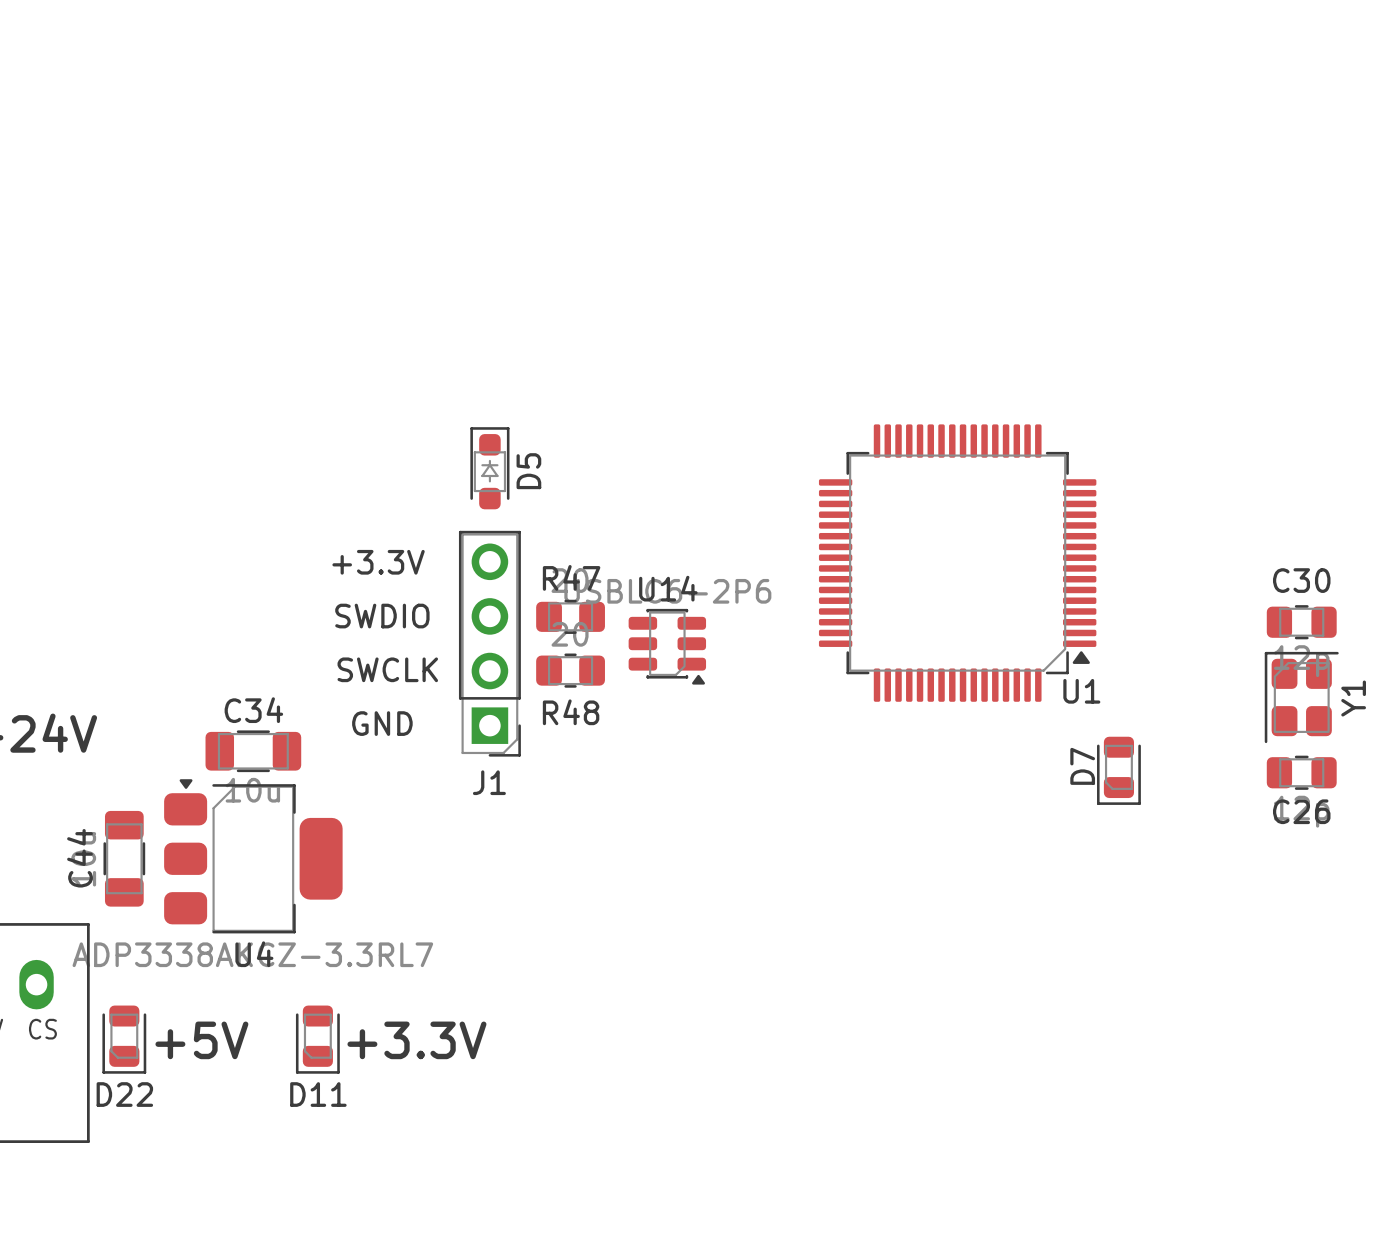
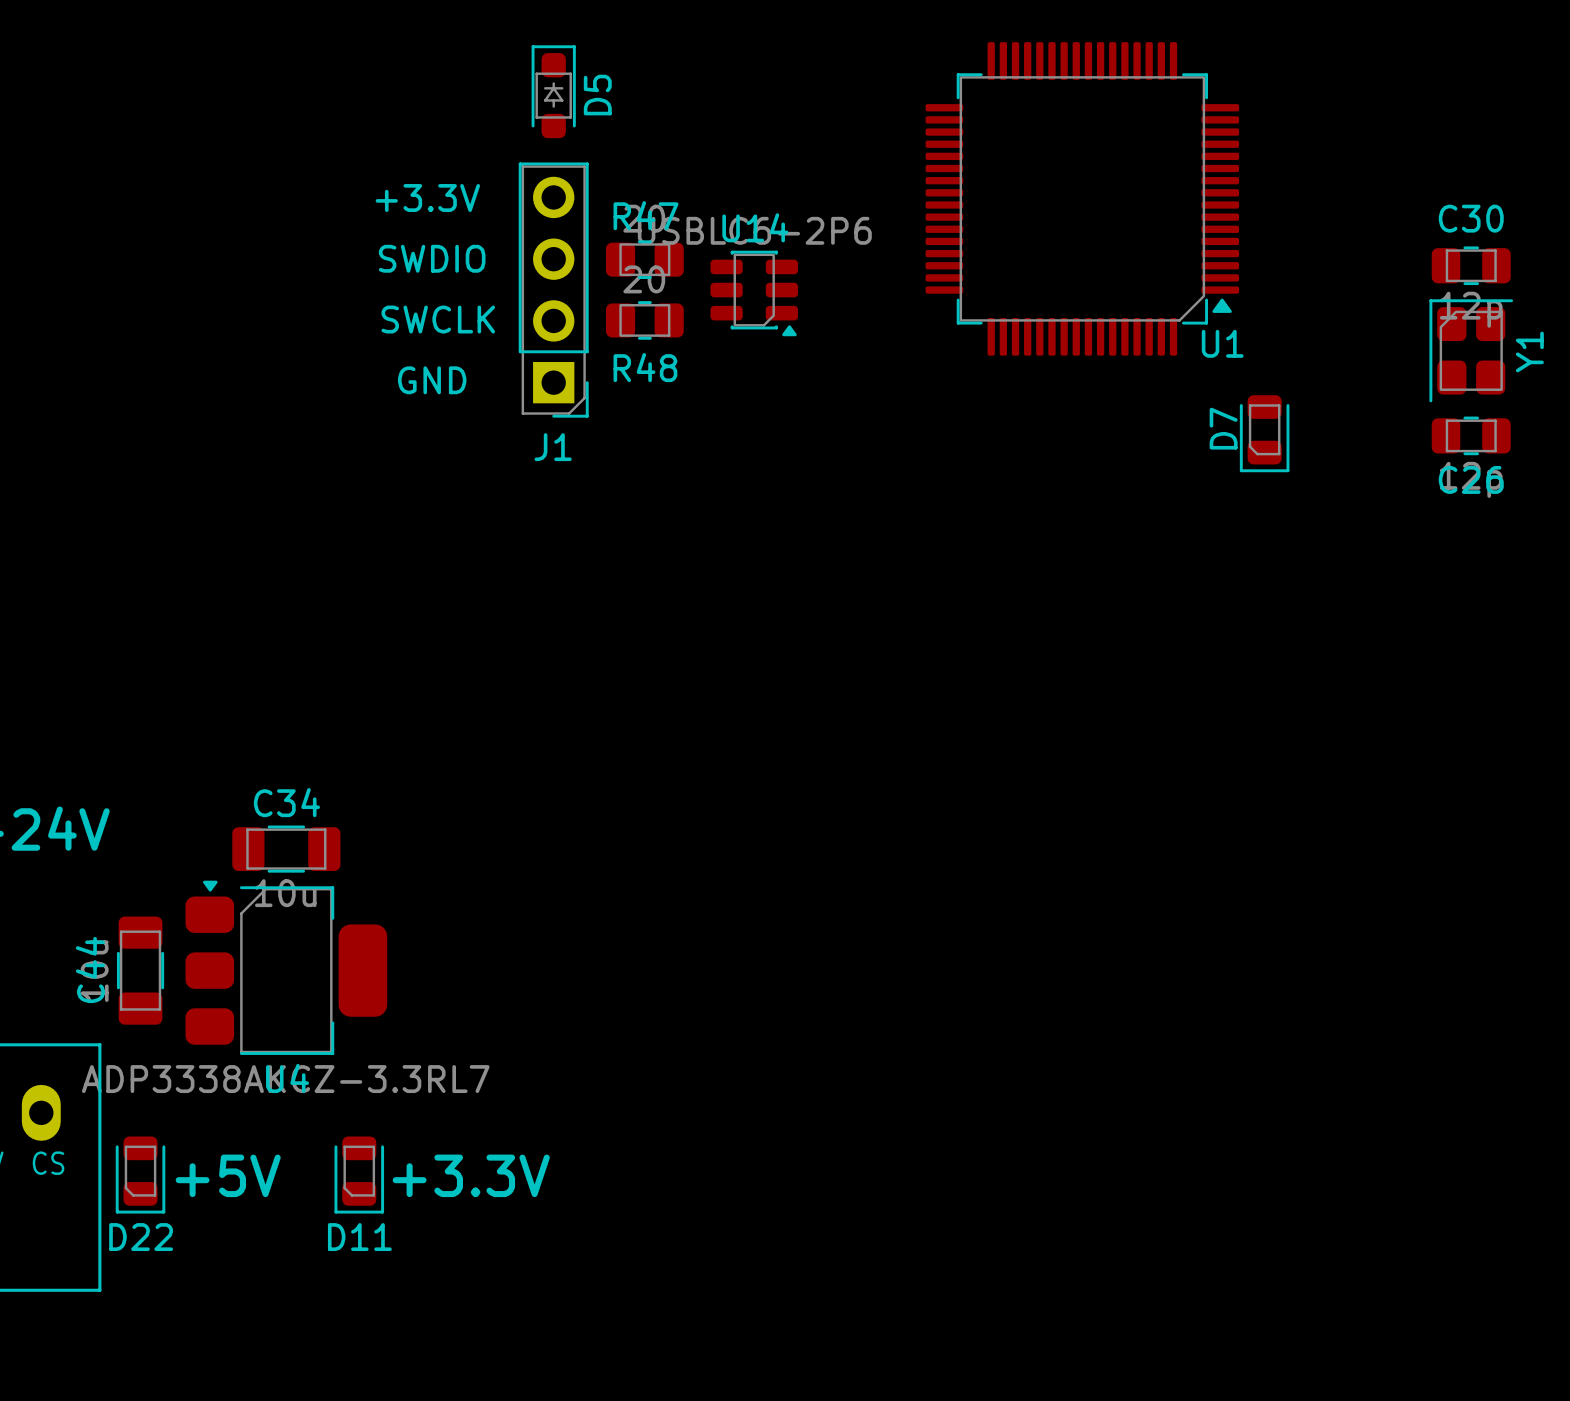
D5 position: (489, 468) -> (553, 91)
text position: +3.3V (378, 562) -> +3.3V (427, 198)
U1 position: (957, 563) -> (1082, 198)
text position: SWDIO (382, 616) -> SWDIO (432, 258)
R47 position: (570, 616) -> (644, 259)
C30 position: (1301, 622) -> (1471, 265)
J1 position: (489, 643) -> (553, 290)
U14 position: (667, 646) -> (754, 293)
text position: SWCLK (387, 669) -> SWCLK (438, 319)
R48 position: (570, 670) -> (644, 320)
Y1 position: (1301, 697) -> (1471, 350)
text position: GND (382, 723) -> GND (432, 380)
D7 position: (1118, 770) -> (1264, 433)
C26 position: (1301, 772) -> (1471, 435)

